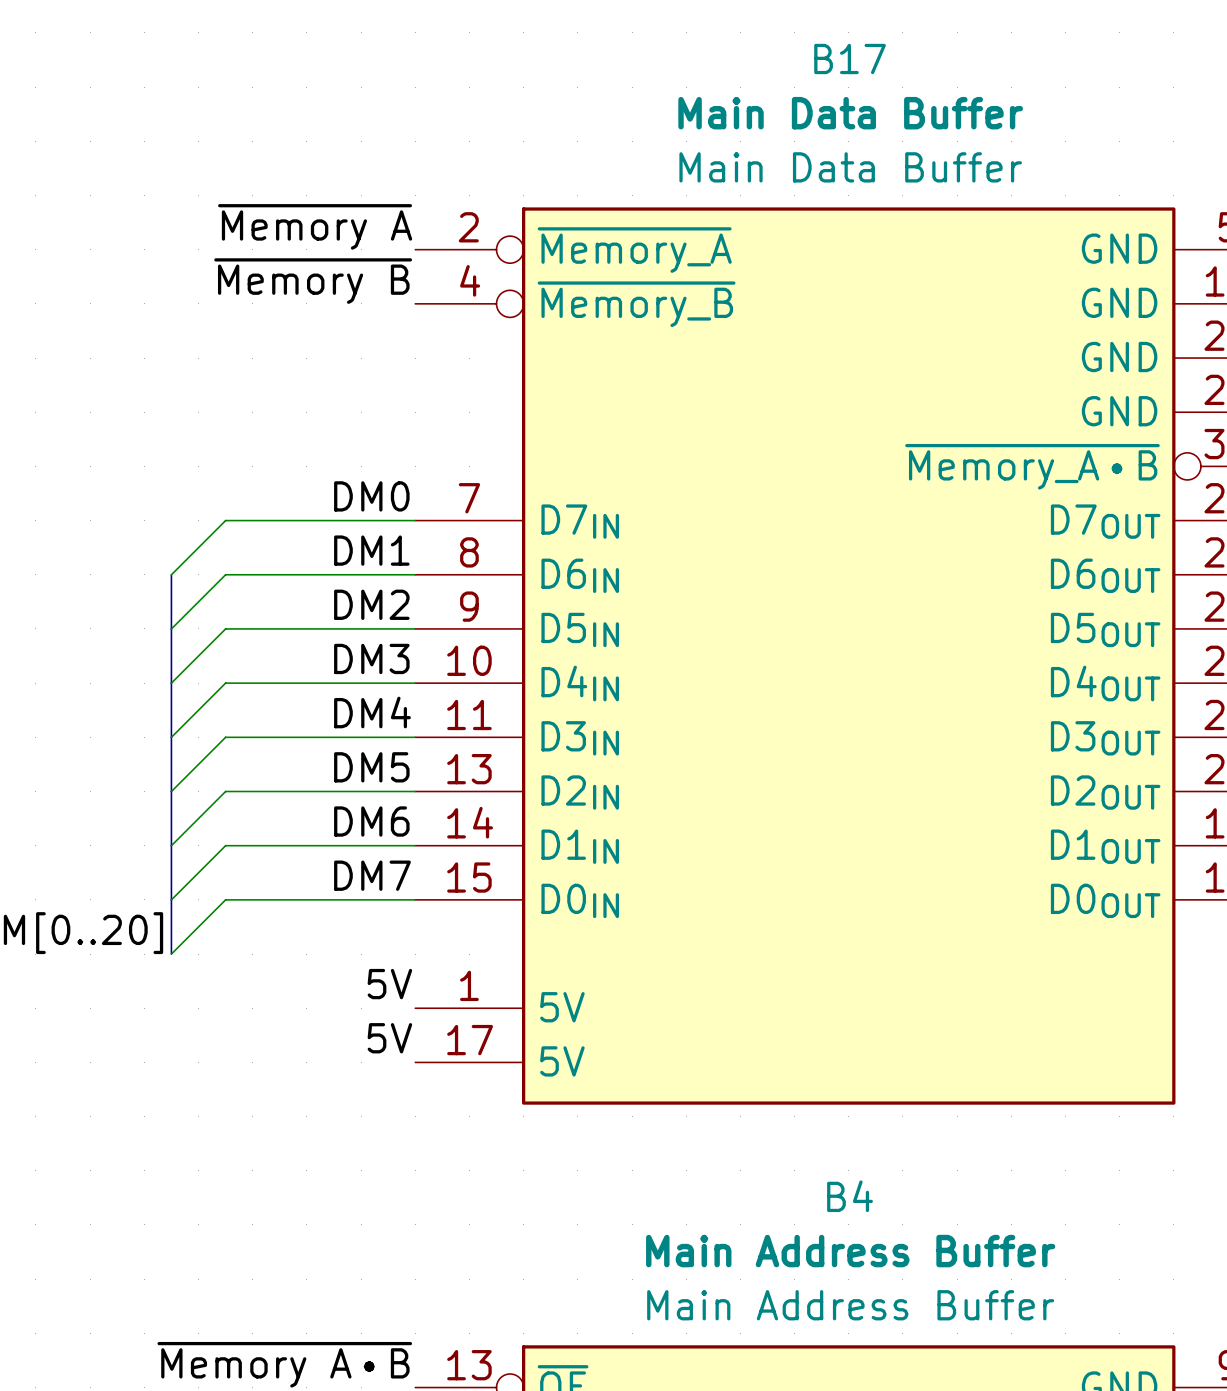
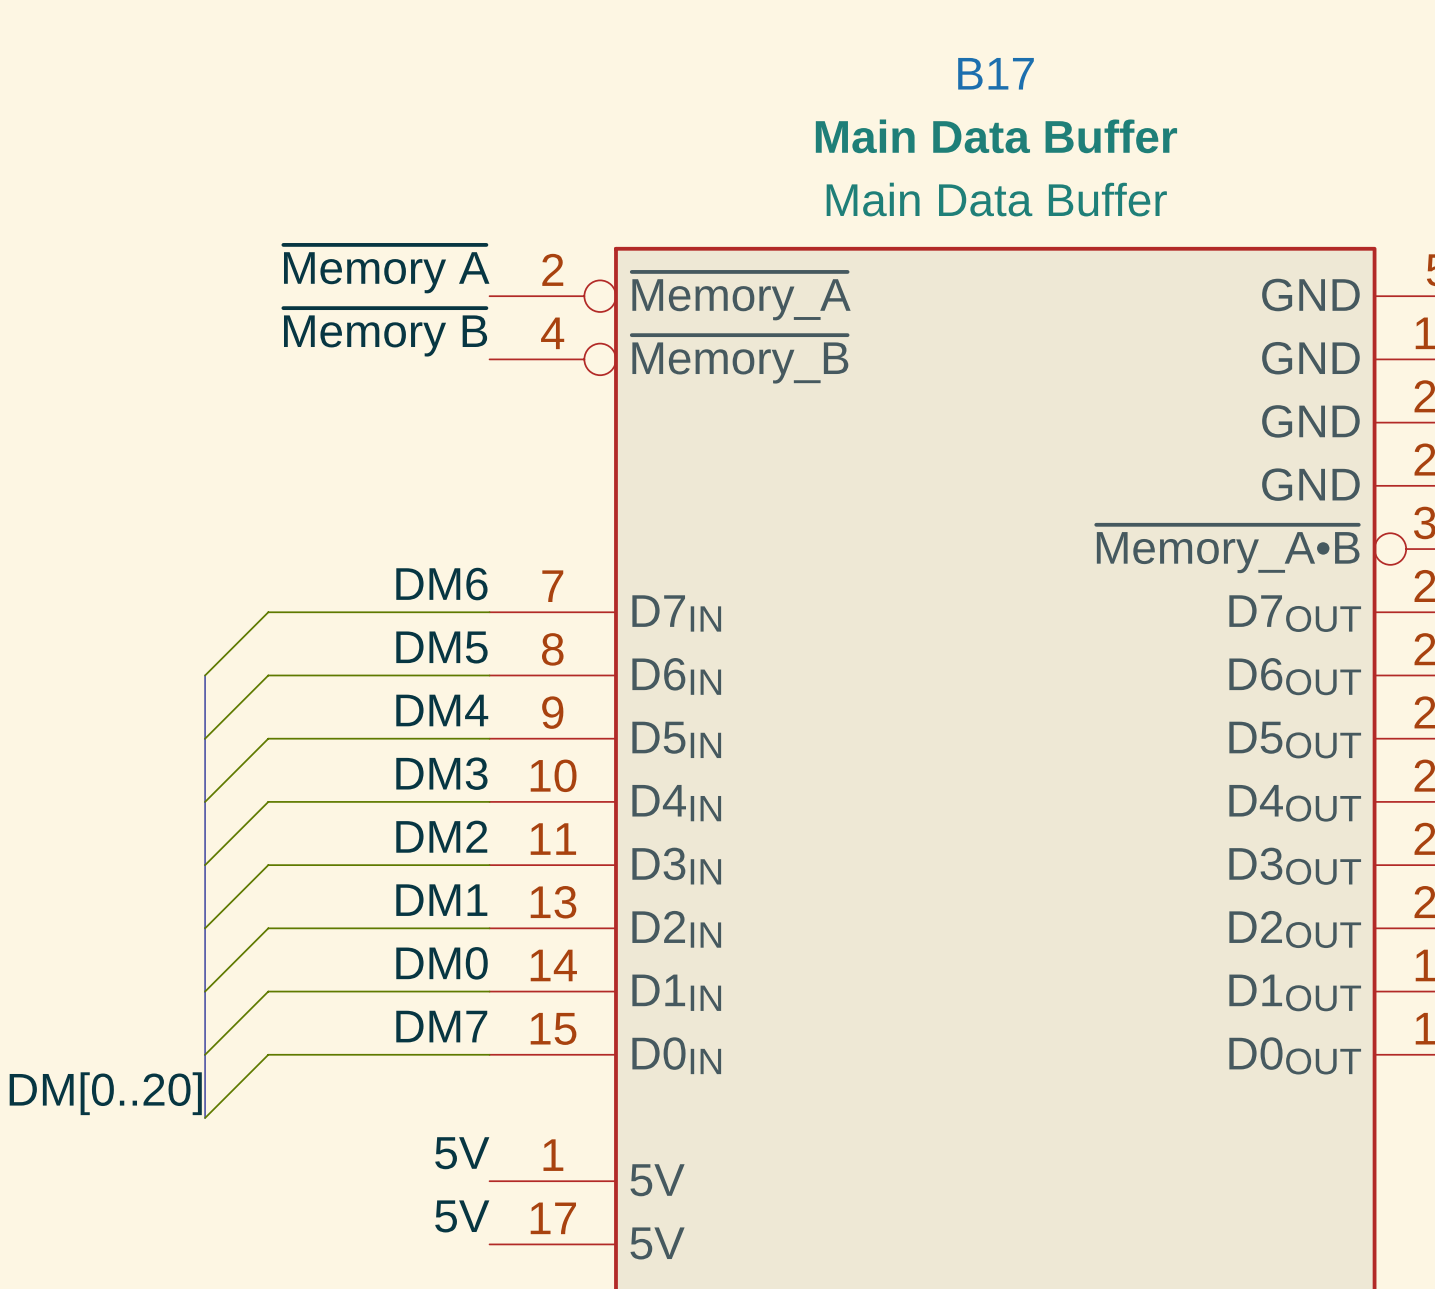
label: DM0 (371, 496) -> DM6 (441, 584)
label: DM1 (371, 550) -> DM5 (441, 647)
label: DM2 (371, 604) -> DM4 (442, 710)
label: DM4 (372, 712) -> DM2 (441, 836)
label: DM5 (371, 767) -> DM1 (441, 900)
label: DM6 (371, 821) -> DM0 (442, 963)

